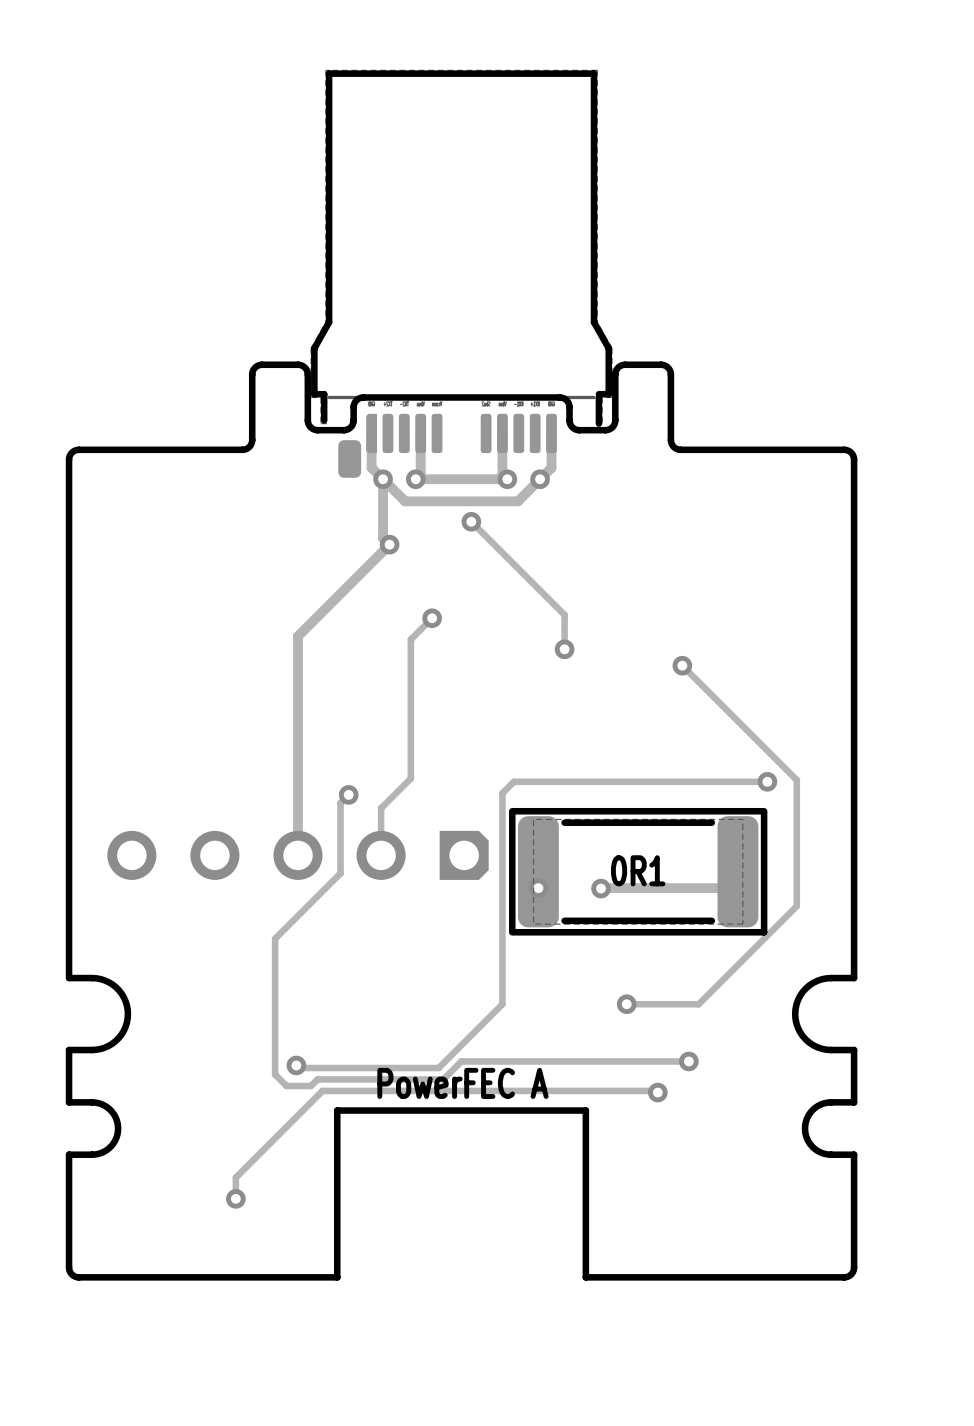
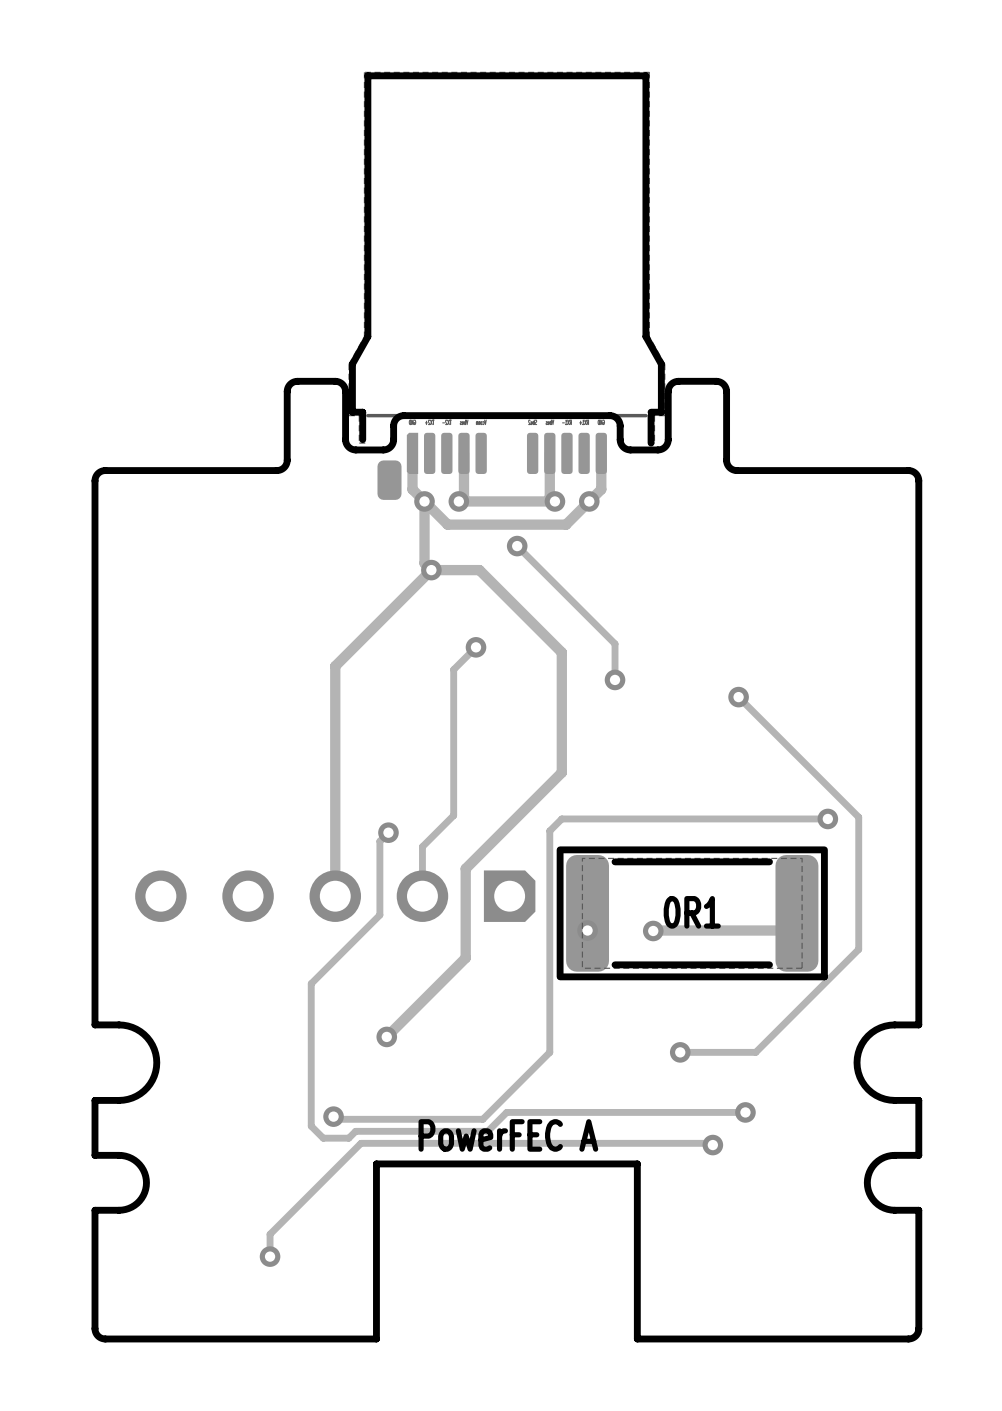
track: none -> (431, 570) (479, 570) (561, 652) (561, 772) (465, 868) (465, 957) (386, 1036)
via: none -> (386, 1036)

